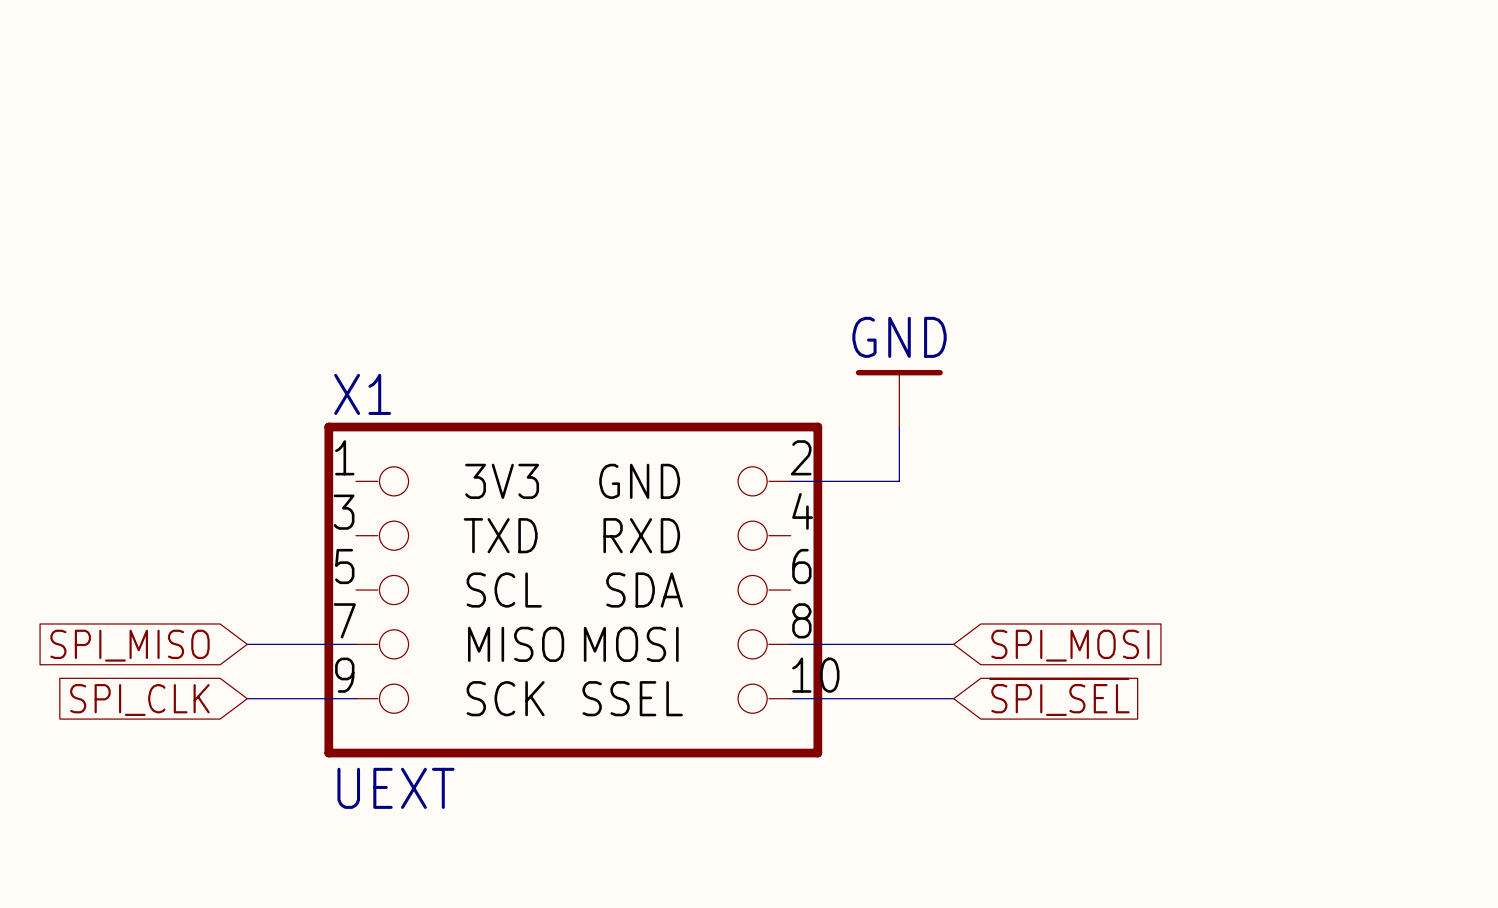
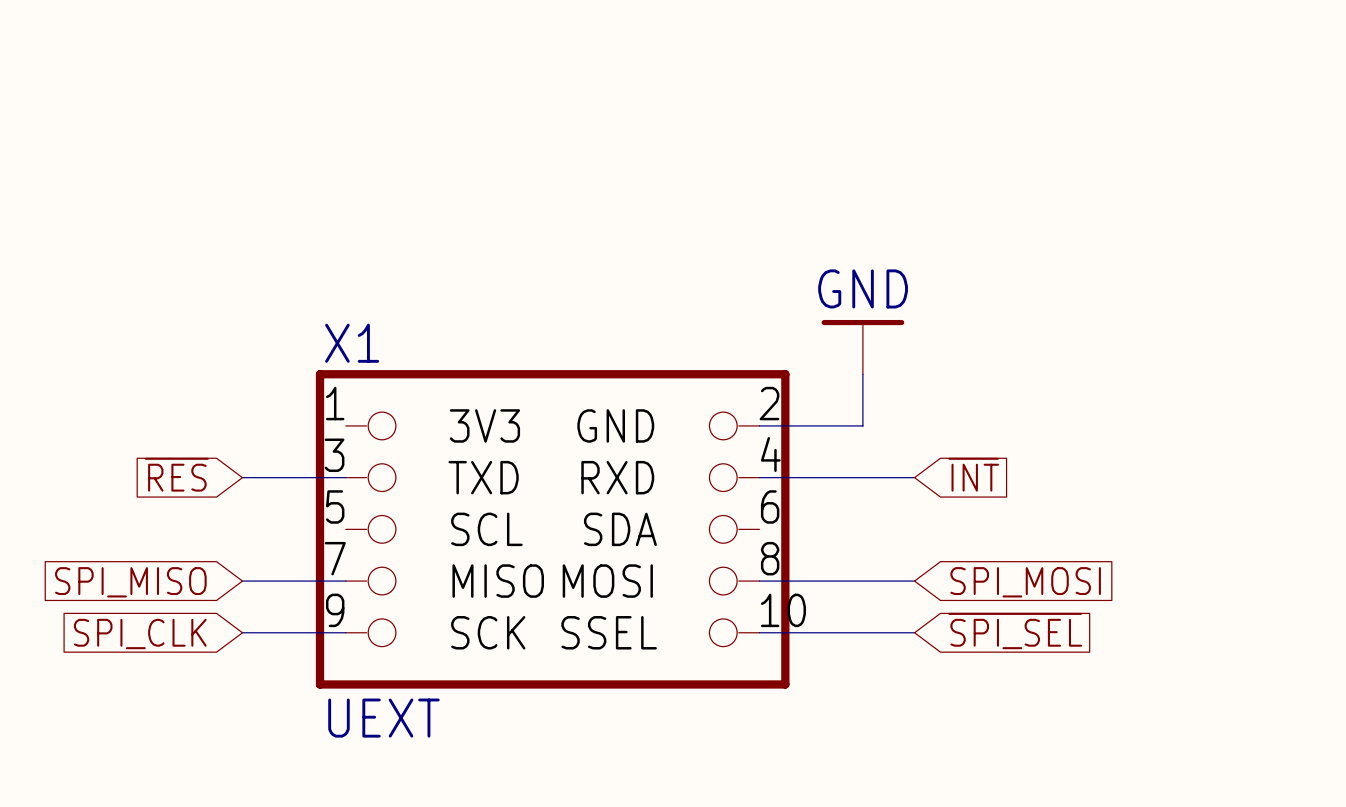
global label: none -> ~{RES} (176, 474)
global label: none -> ~{INT} (973, 474)
wire: none -> (242, 477) (345, 477)
wire: none -> (759, 477) (914, 477)

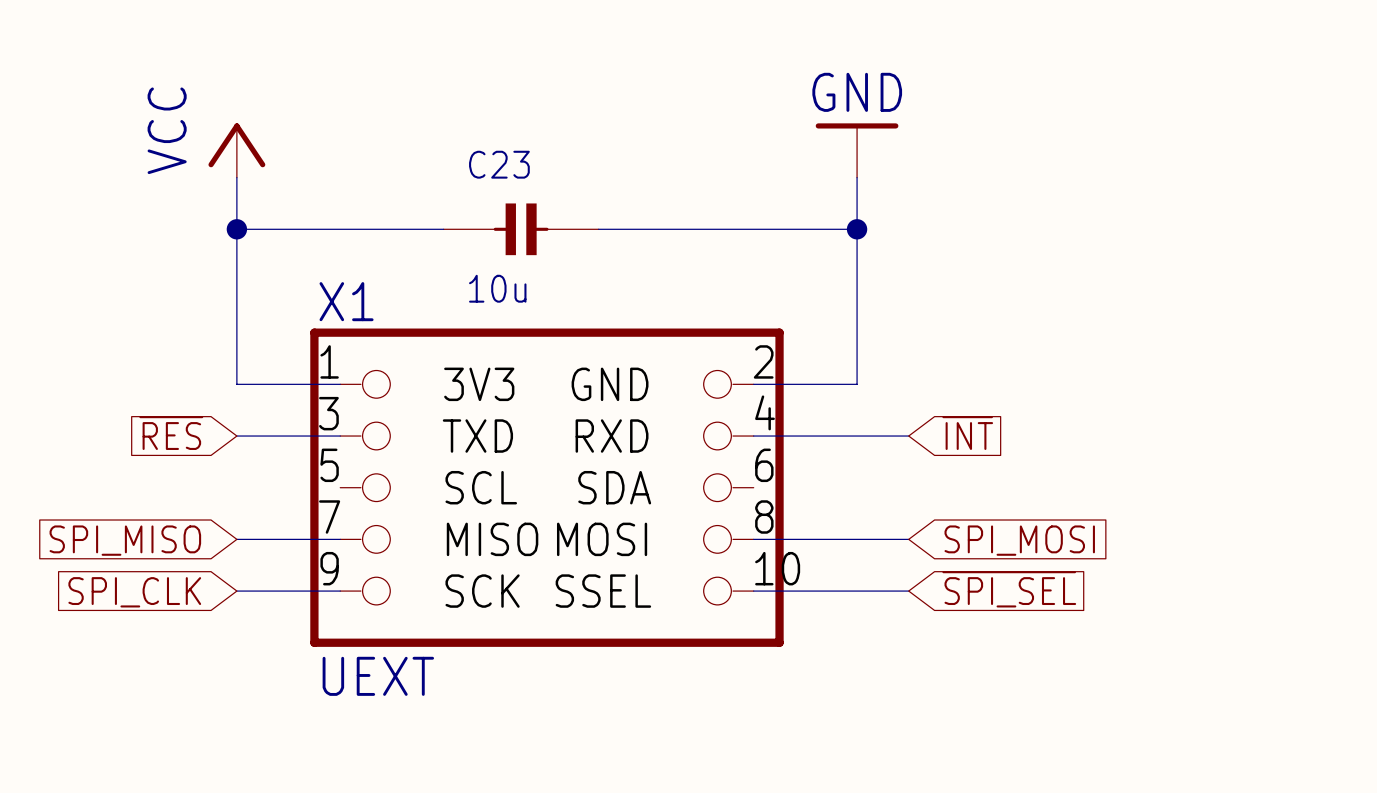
power symbol: none -> VCC (236, 150)
wire: none -> (236, 177) (236, 384) (340, 384)
wire: none -> (857, 177) (857, 332)
wire: none -> (236, 229) (443, 229)
junction: none -> (236, 229)
C23: none -> 10u (521, 229)
wire: none -> (598, 229) (857, 229)
junction: none -> (857, 229)
power symbol position: GND (862, 347) -> GND (857, 150)

